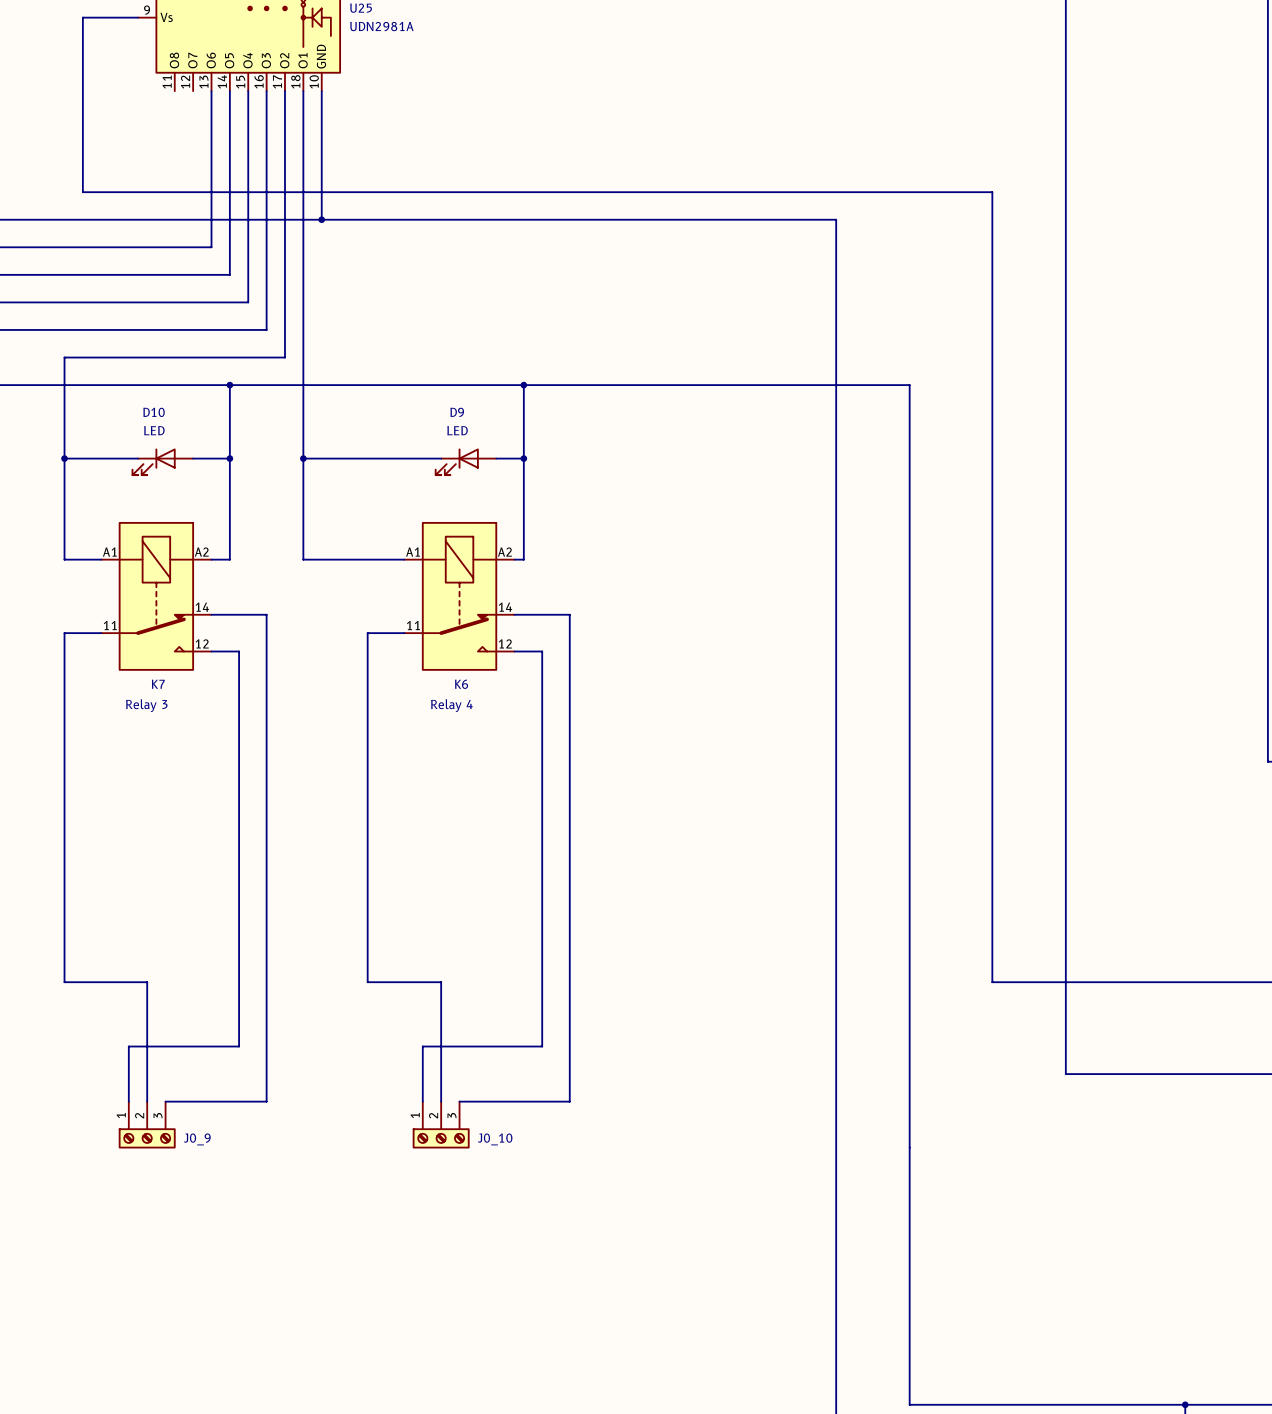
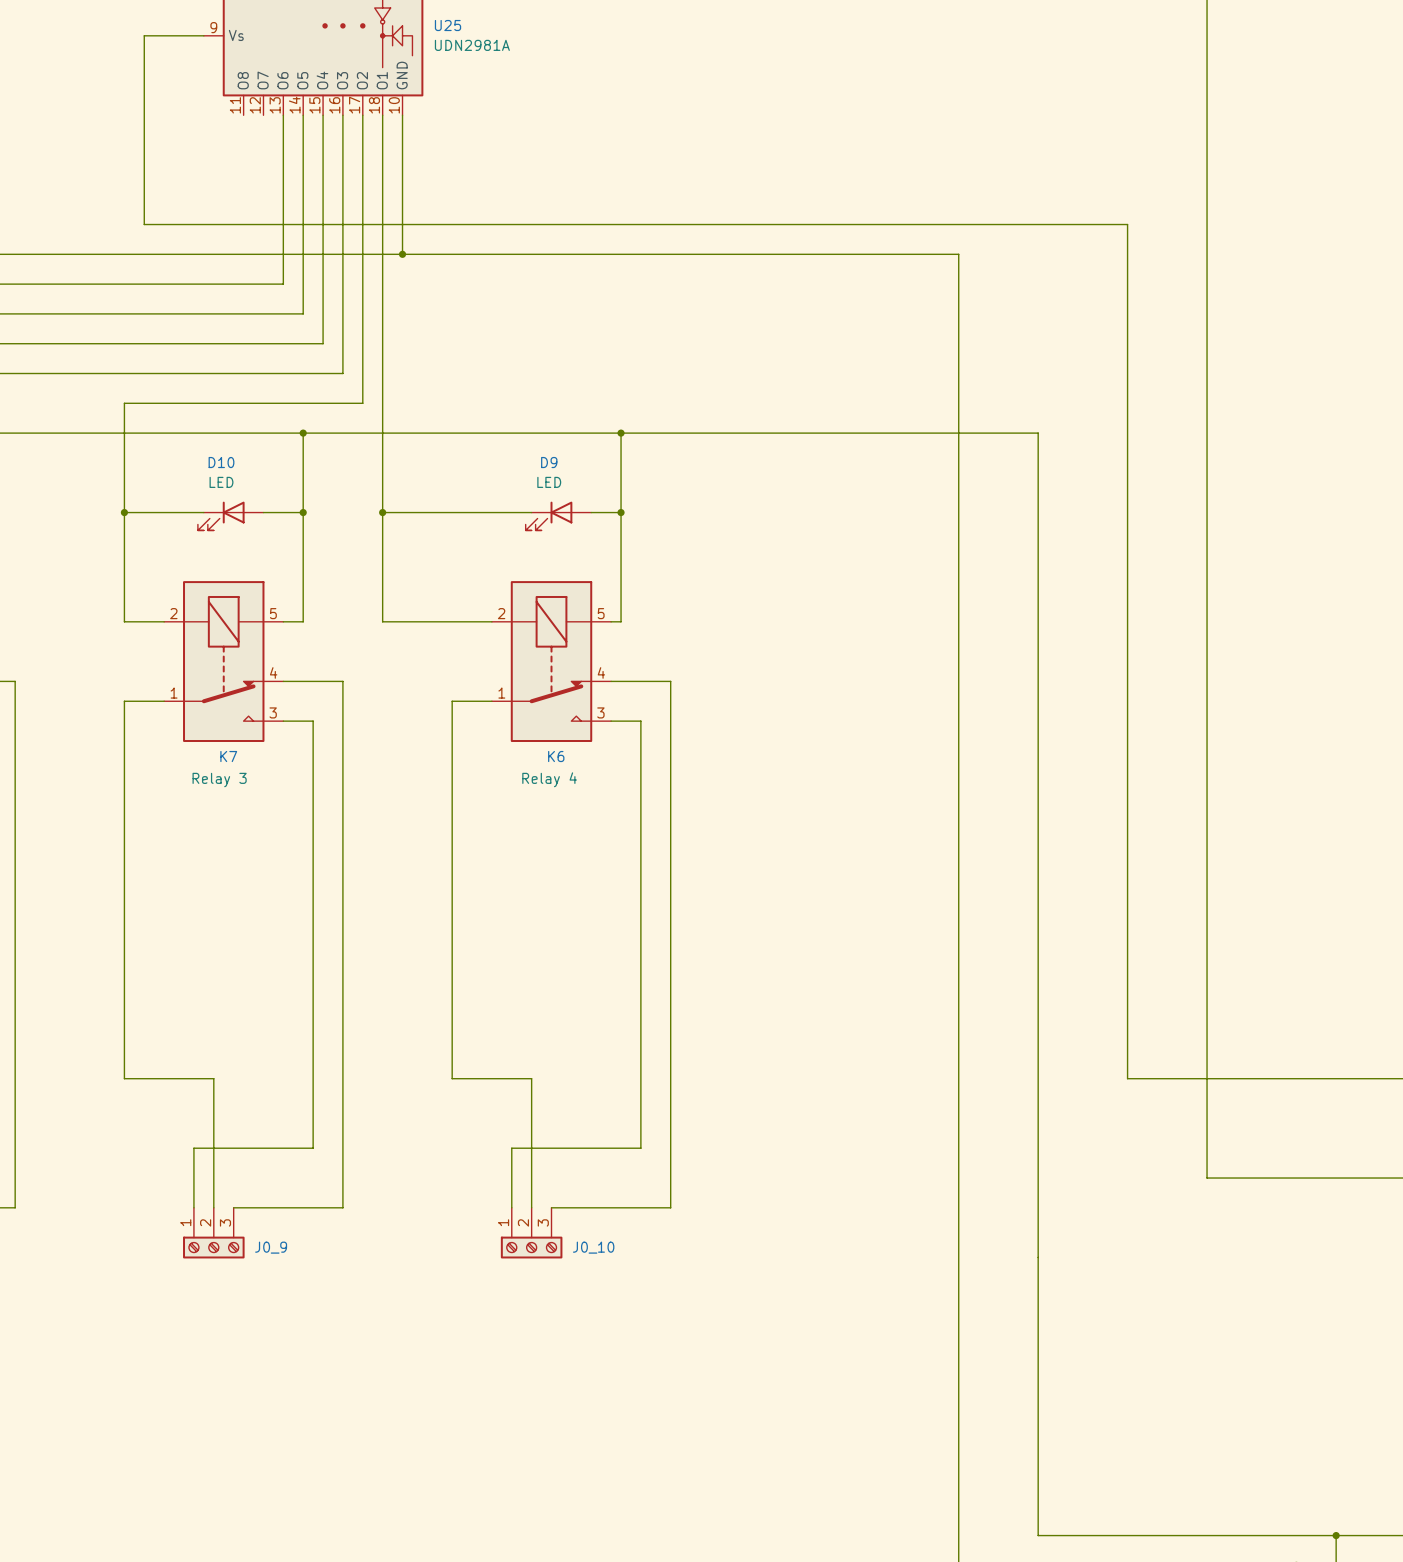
K7 pin number: A1 (109, 552) -> 2 (173, 613)
K7 pin number: A2 (201, 552) -> 5 (273, 613)
K6 pin number: A1 (413, 552) -> 2 (501, 613)
K6 pin number: A2 (504, 552) -> 5 (601, 613)
K7 pin number: 14 (202, 607) -> 4 (273, 672)
K6 pin number: 14 (505, 607) -> 4 (601, 672)
K7 pin number: 11 (110, 625) -> 1 (174, 693)
K6 pin number: 11 (413, 625) -> 1 (501, 693)
K7 pin number: 12 (202, 643) -> 3 (273, 712)
K6 pin number: 12 (505, 643) -> 3 (600, 712)

